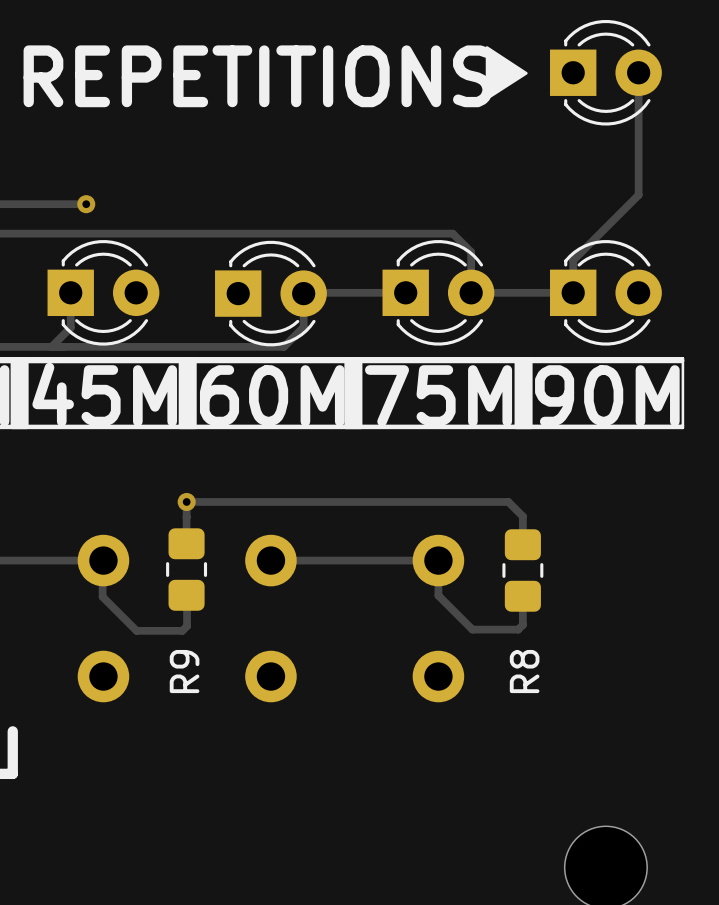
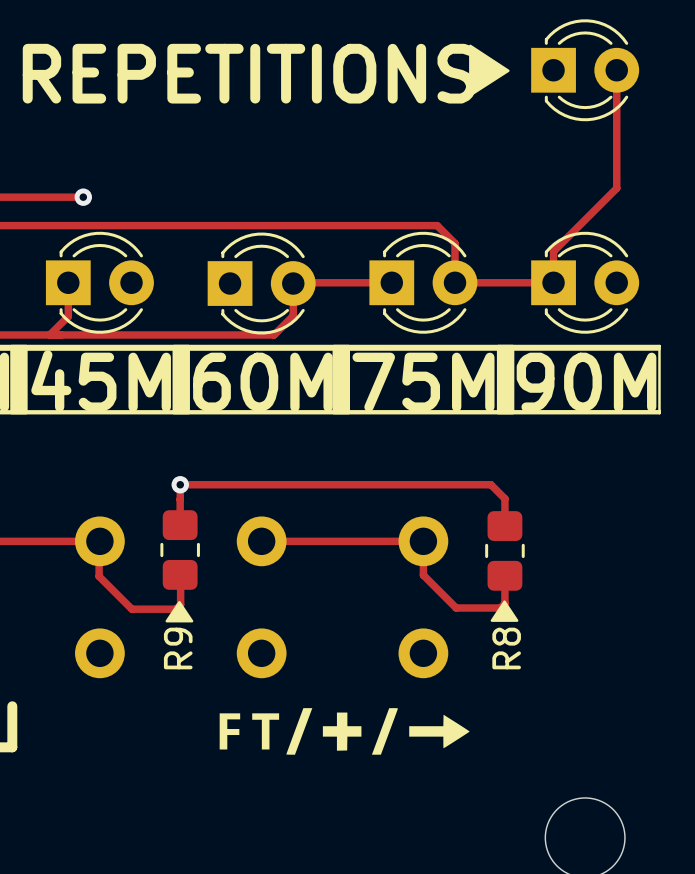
drawing: none -> [490, 600, 519, 622]
drawing: none -> [165, 600, 194, 623]
drawing: none -> [219, 708, 470, 755]

